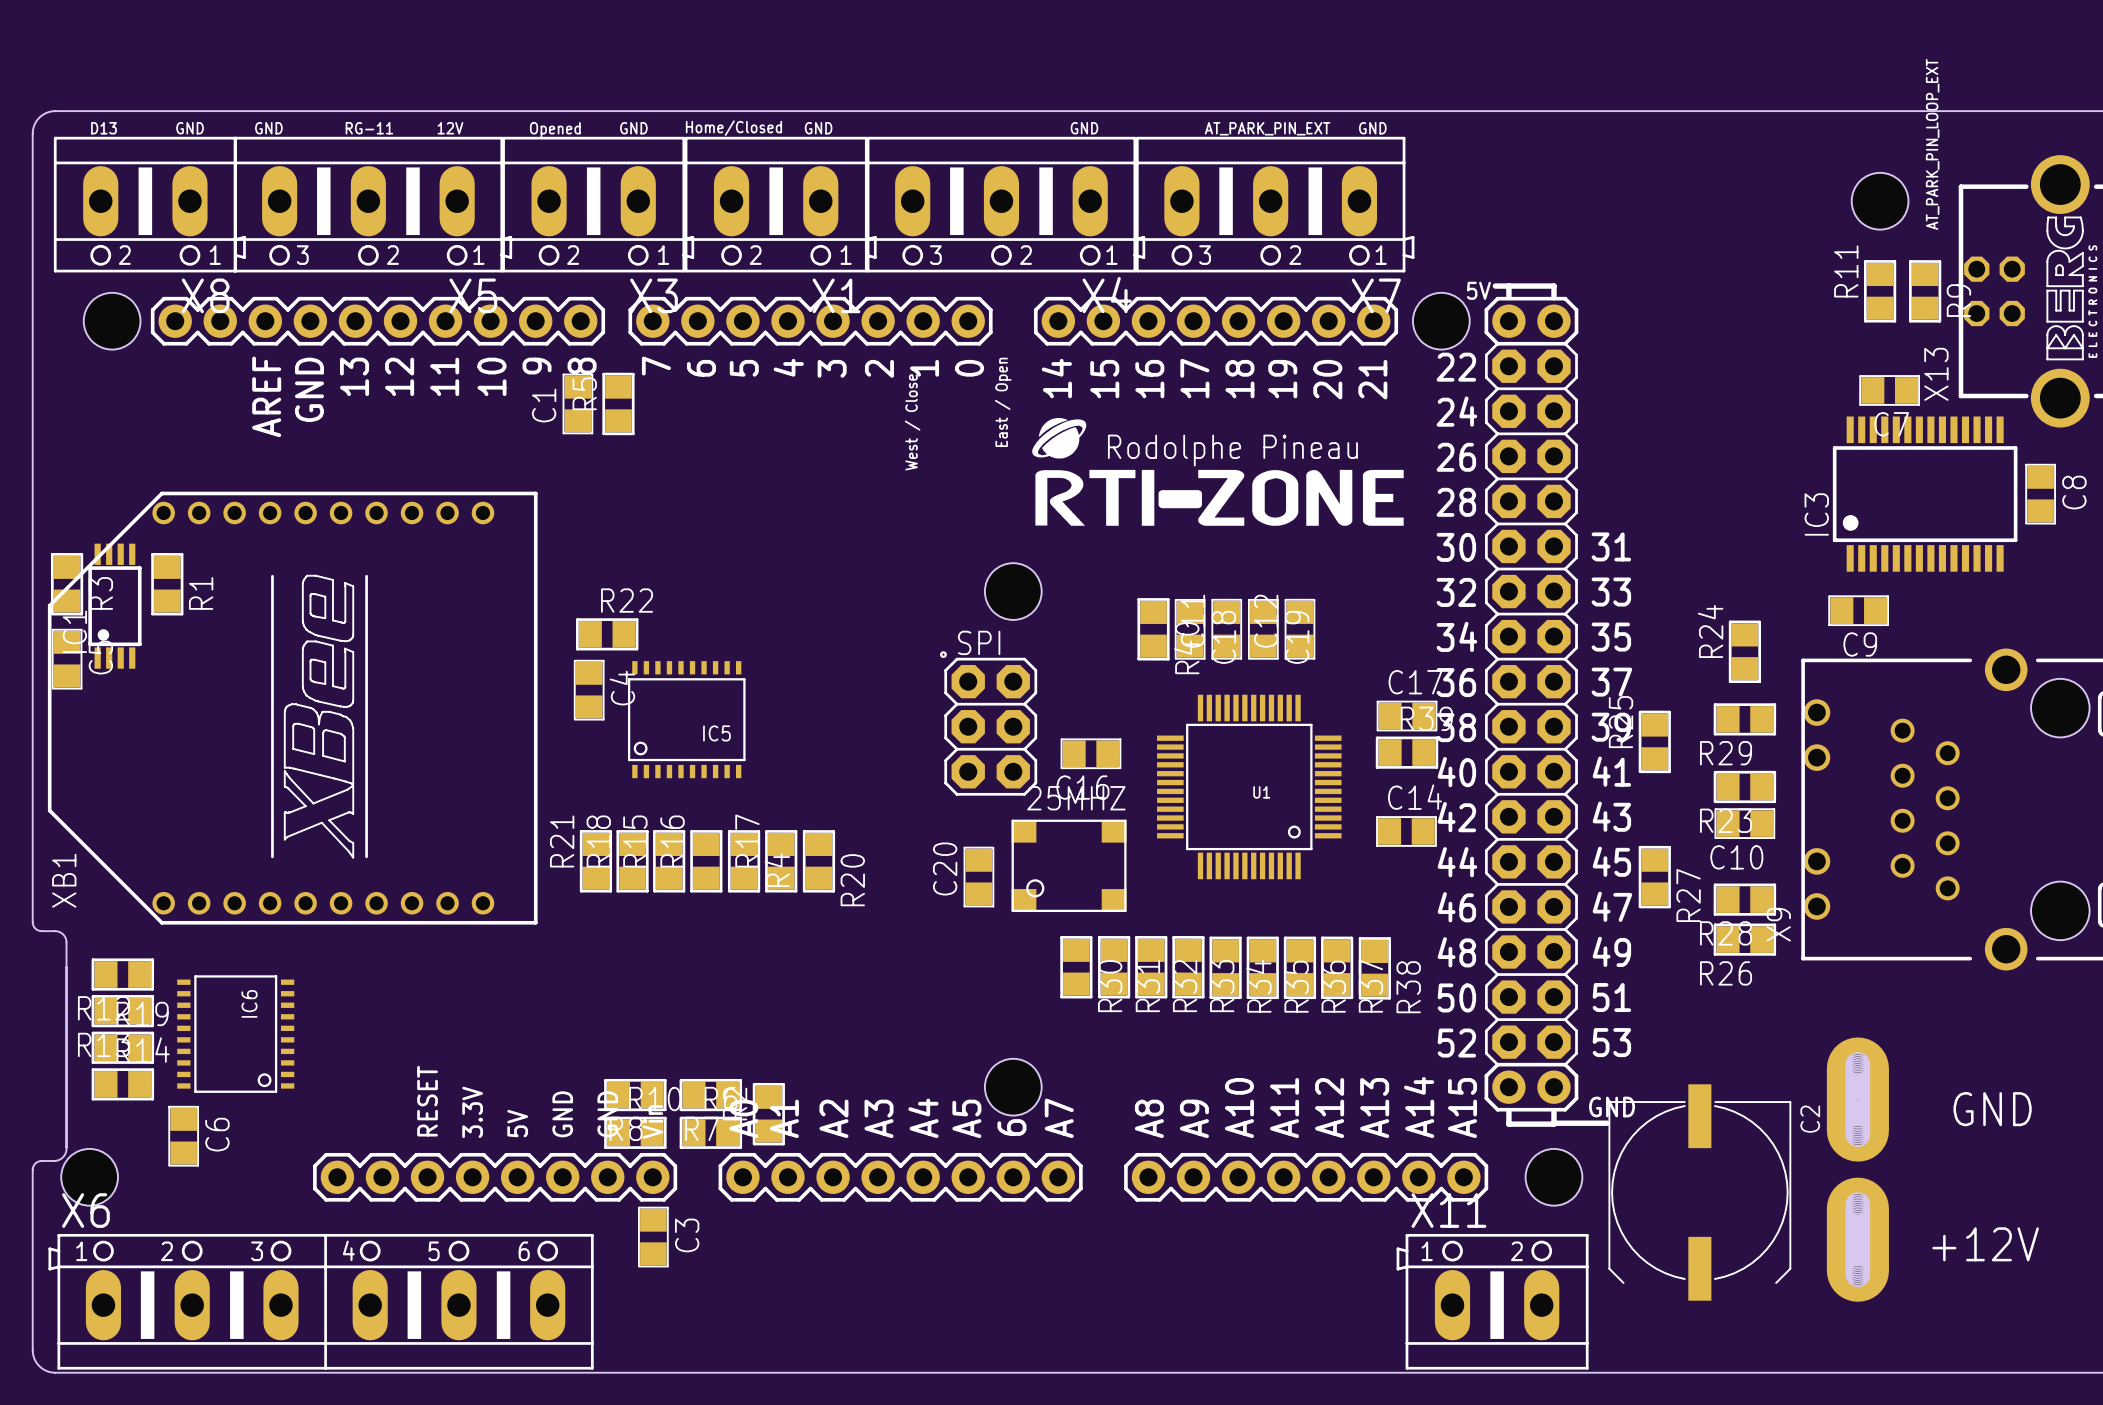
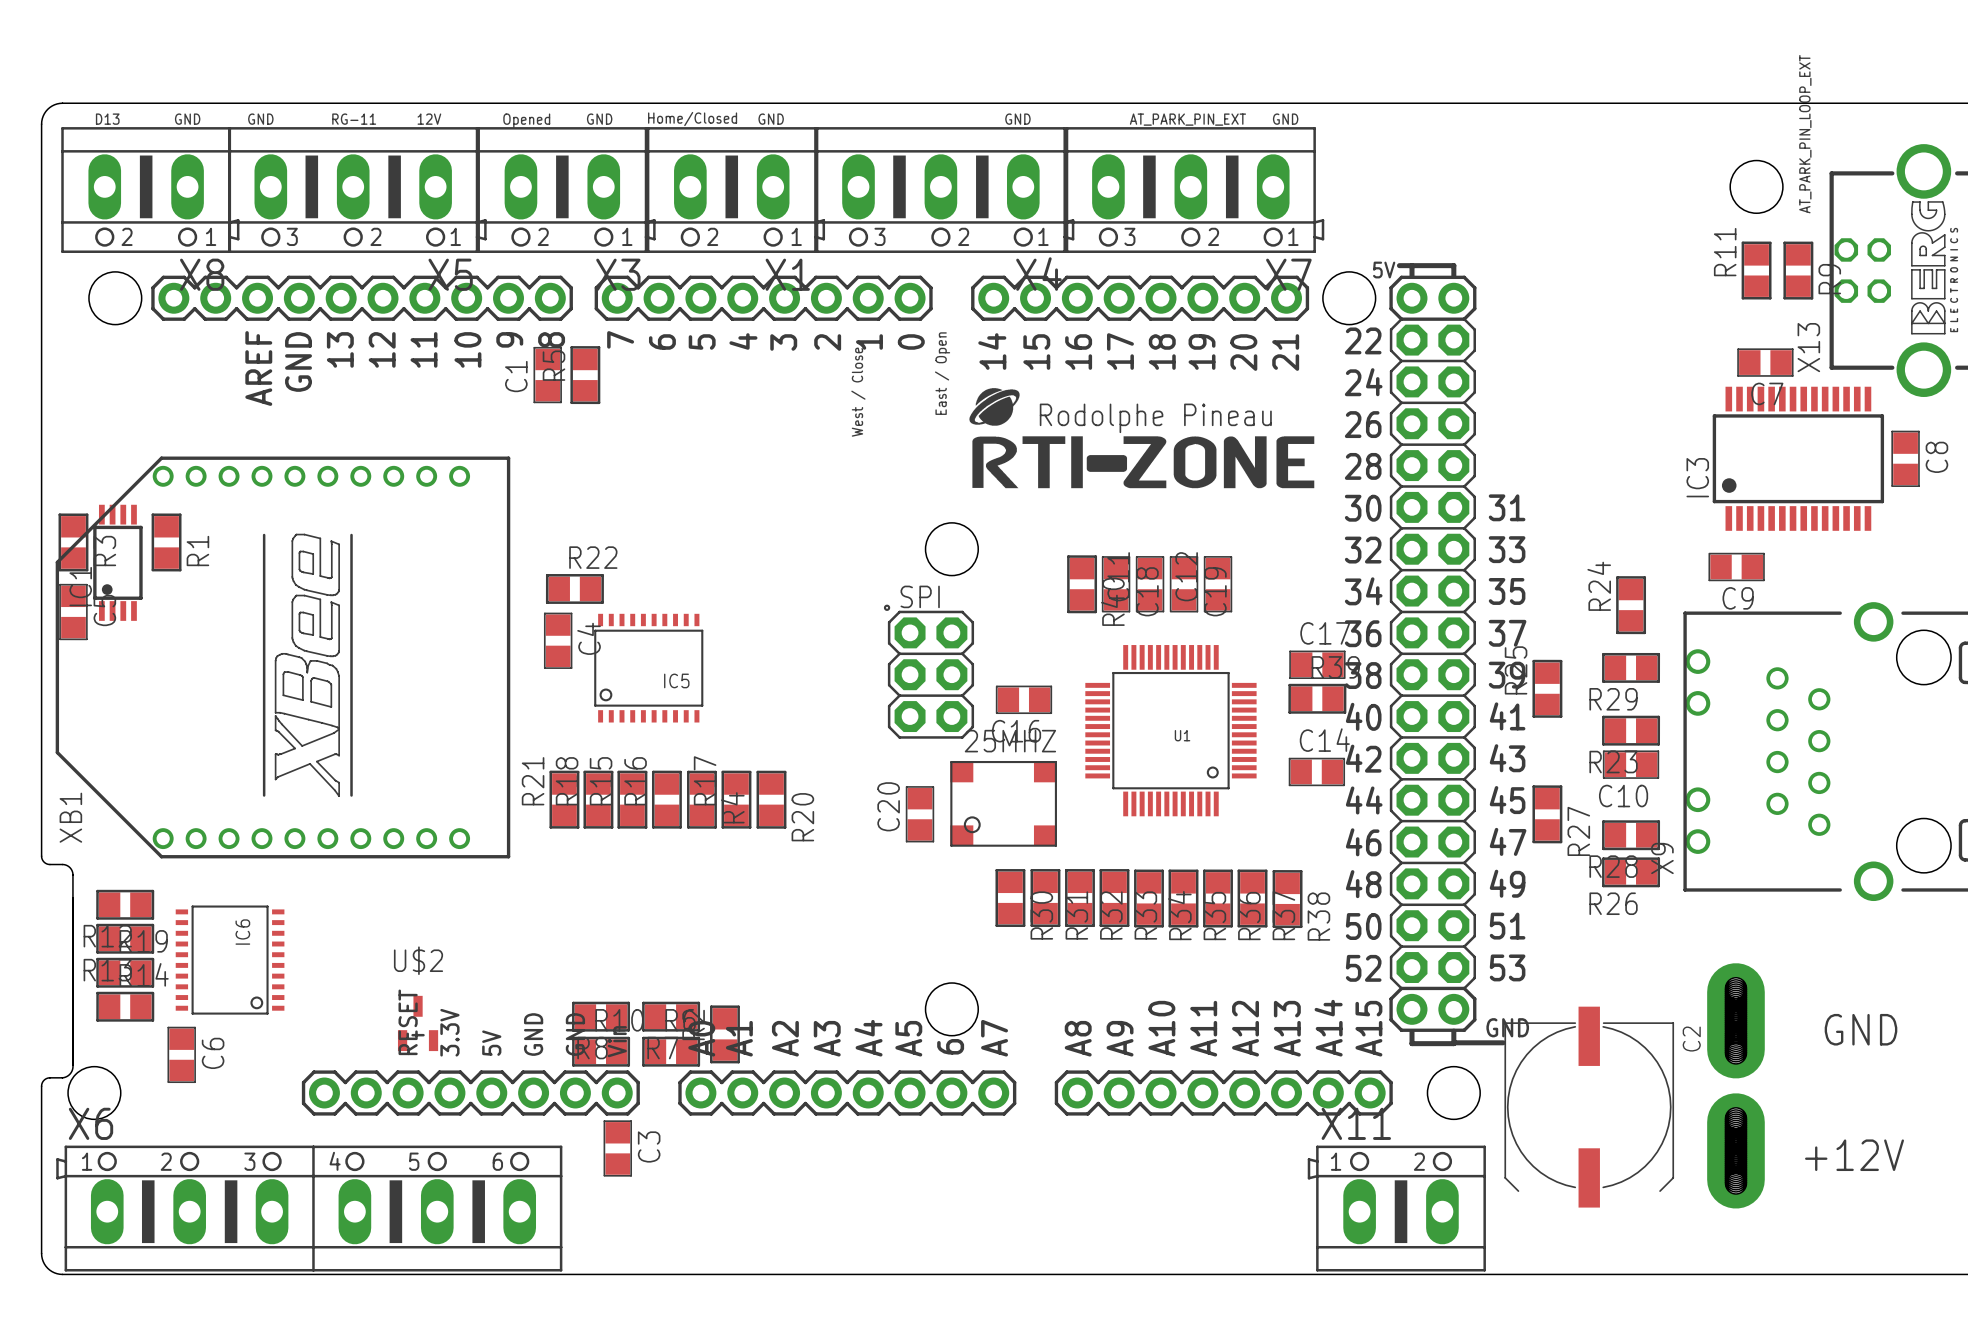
U$2: none -> (418, 1023)

